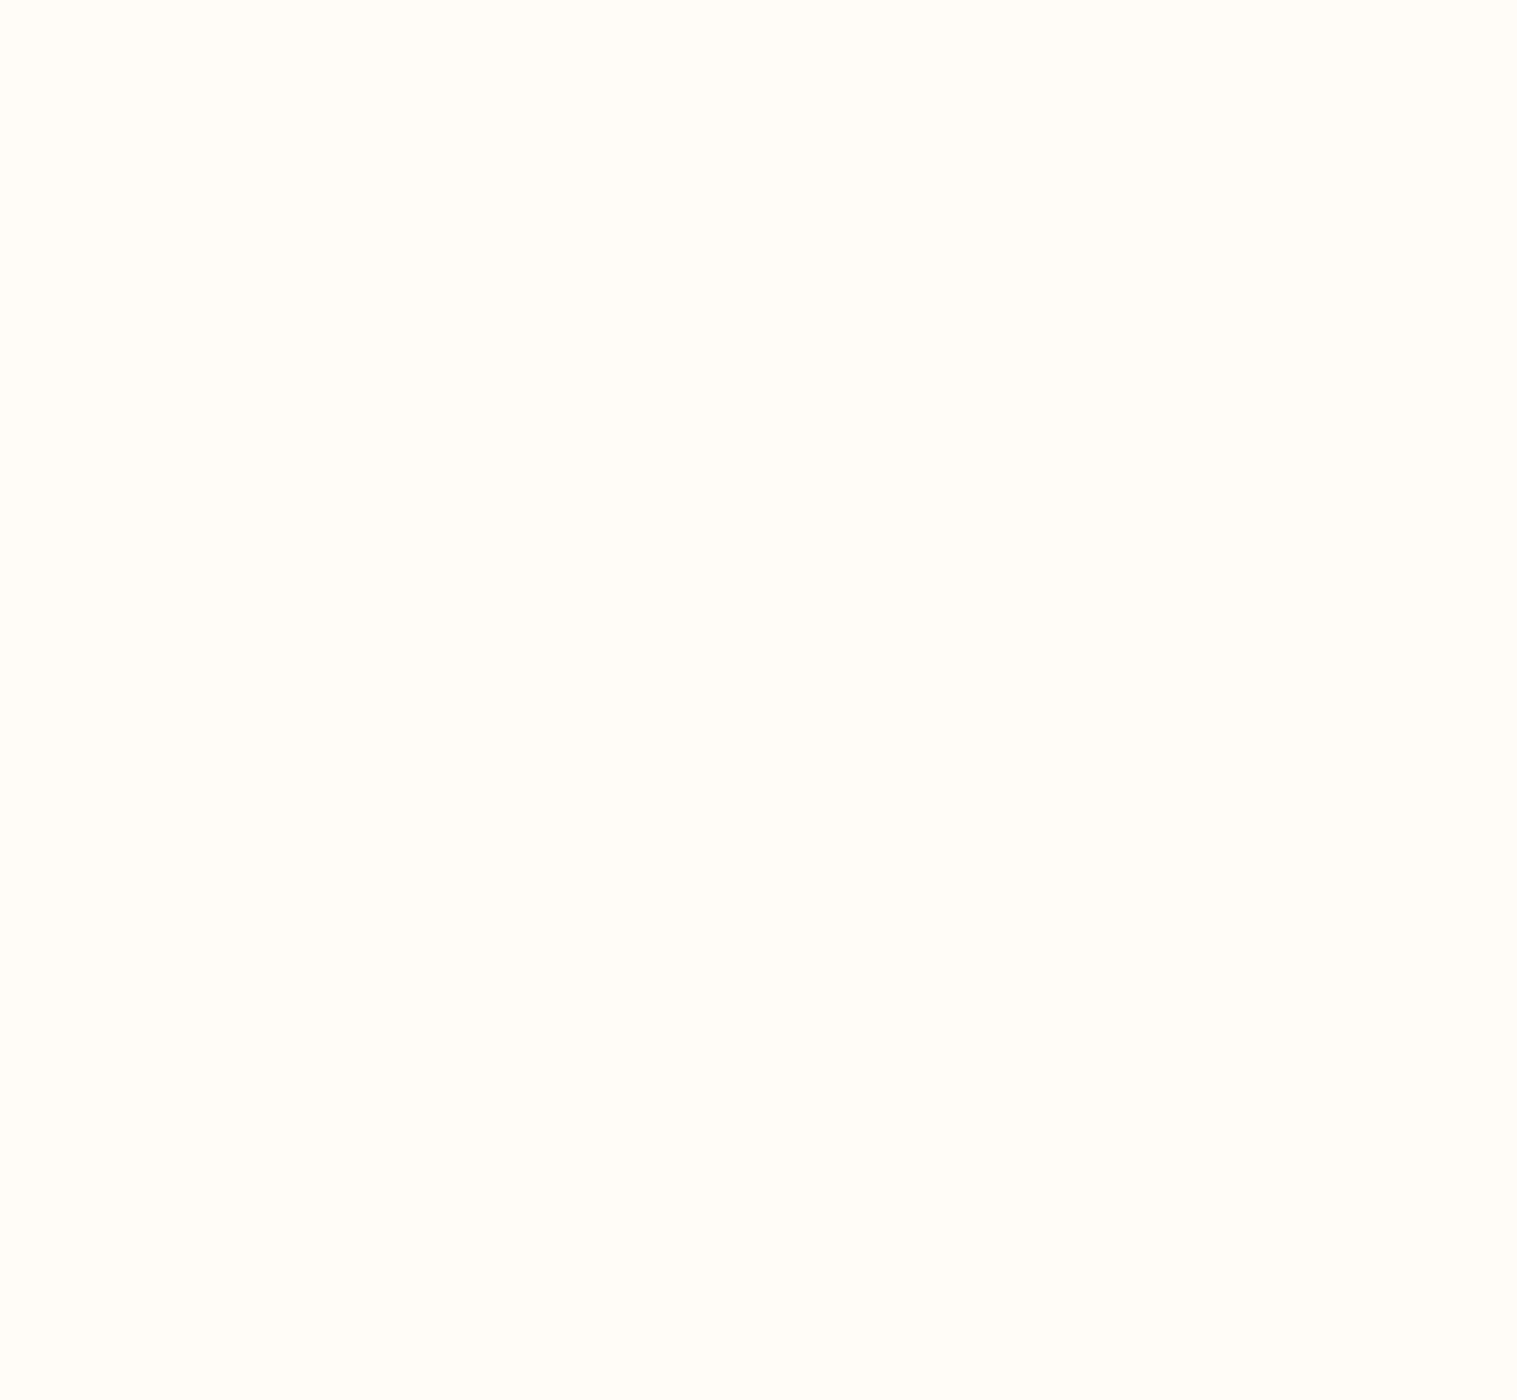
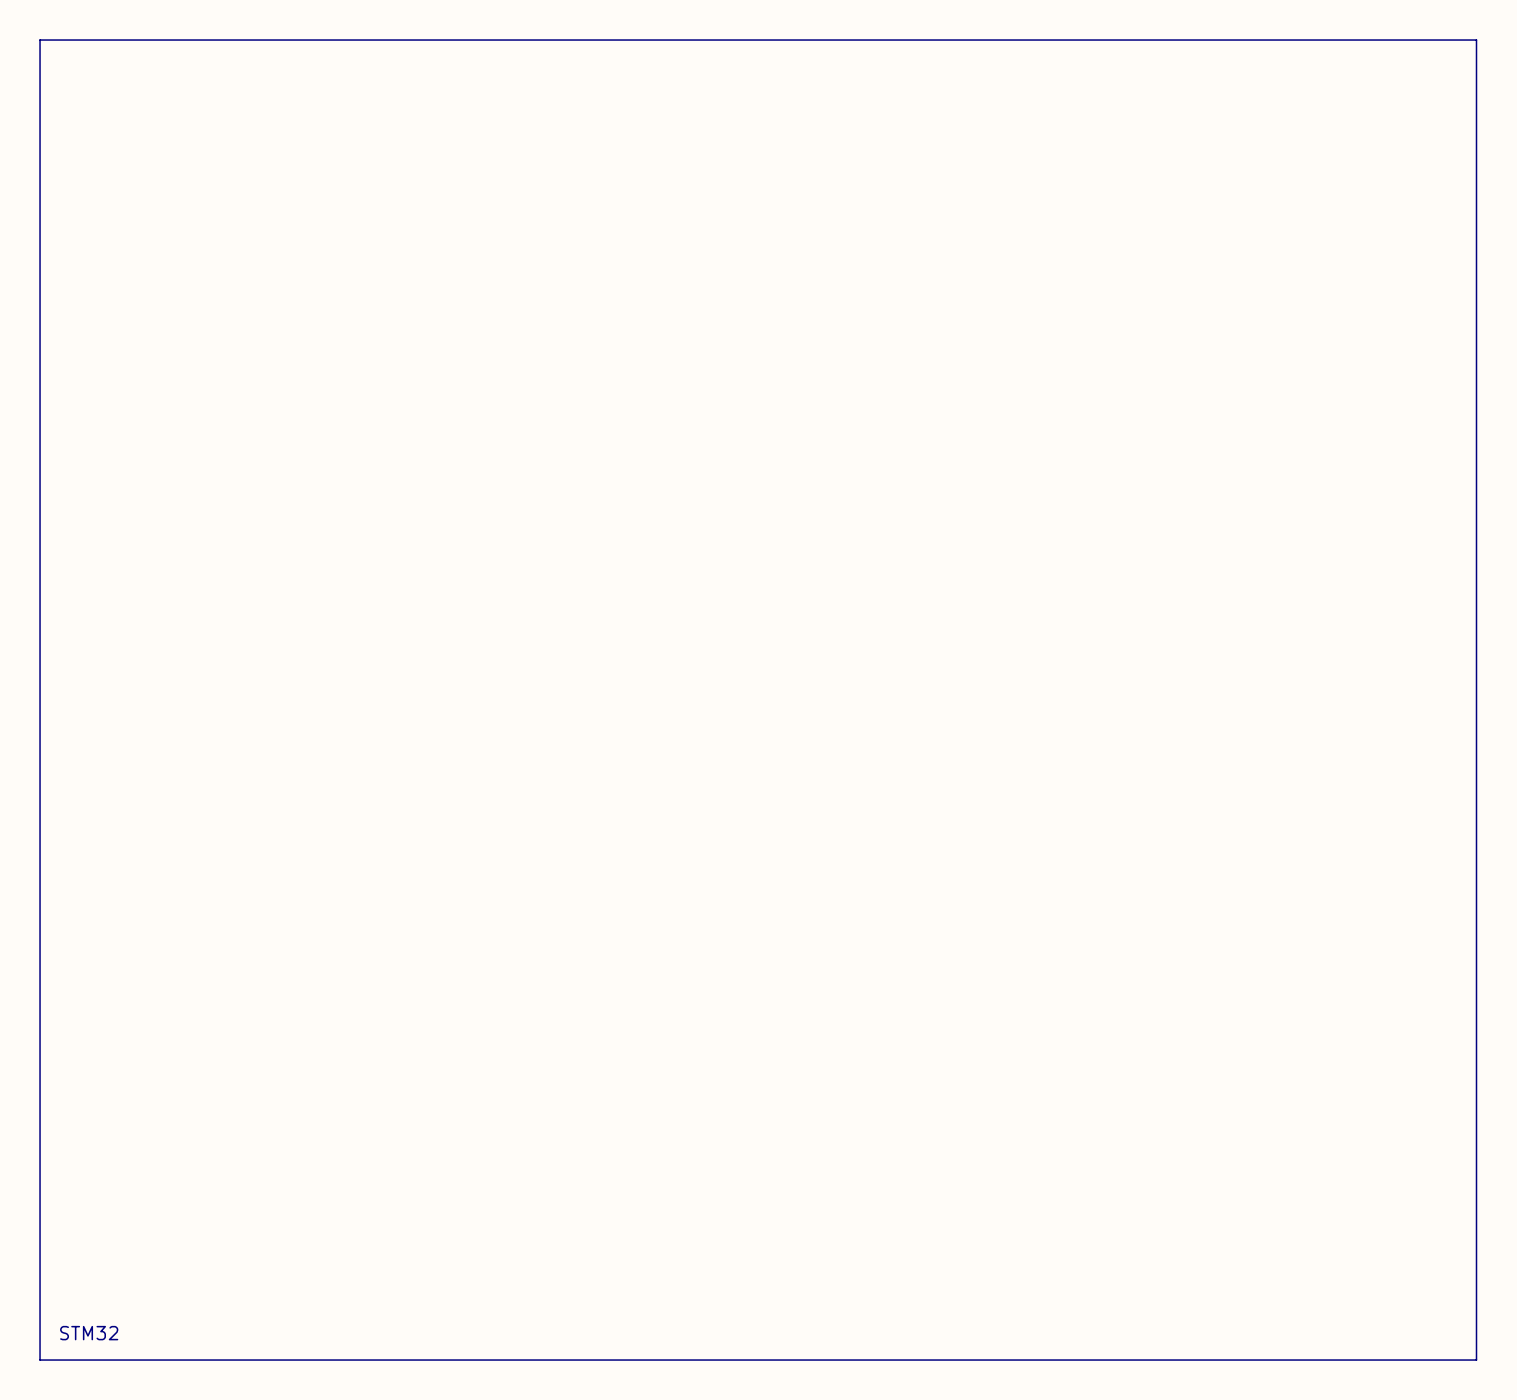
line: none -> (40, 40) (1476, 40) (1476, 1360) (40, 1360) (40, 40)
text: none -> STM32 (89, 1333)

